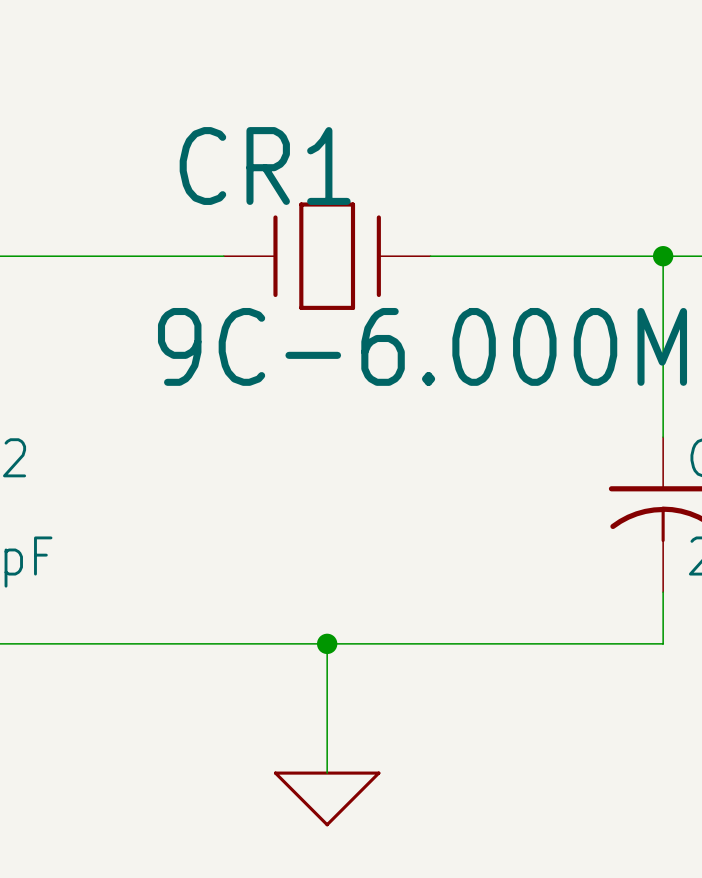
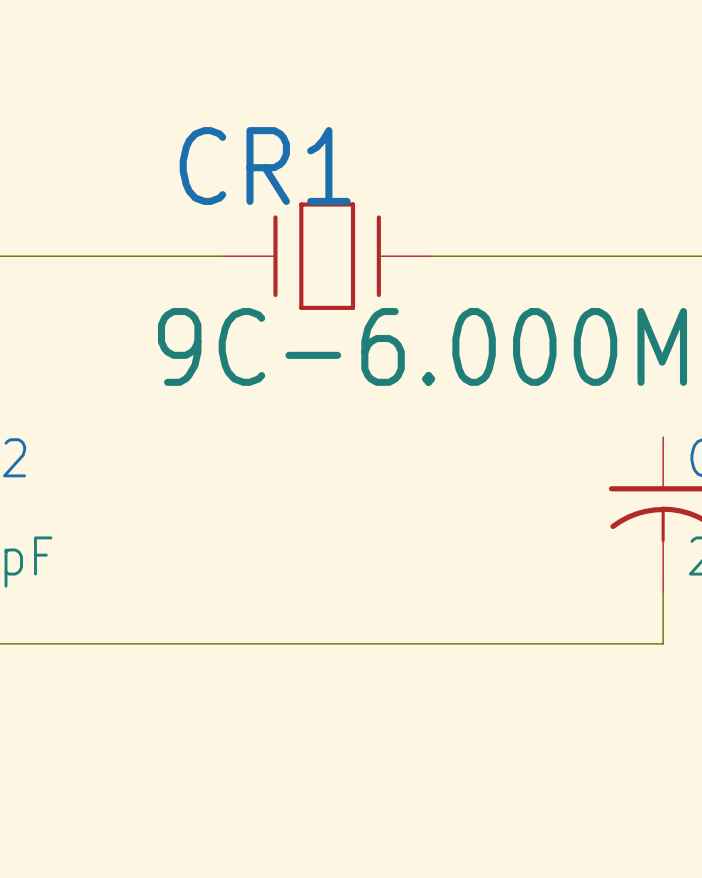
wire: (663, 256) (663, 437) -> none
junction: (663, 256) -> none
wire: (327, 643) (327, 773) -> none
junction: (327, 643) -> none
power symbol: (327, 798) -> none

